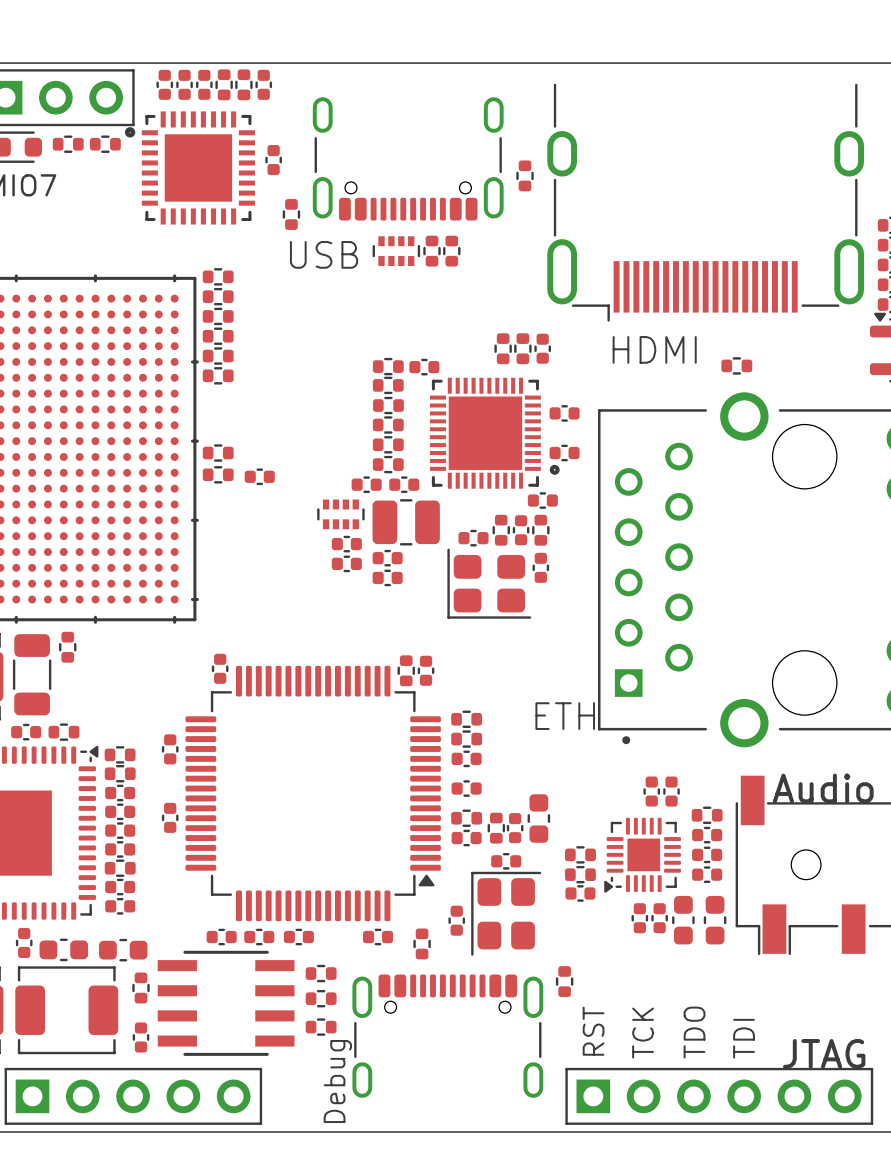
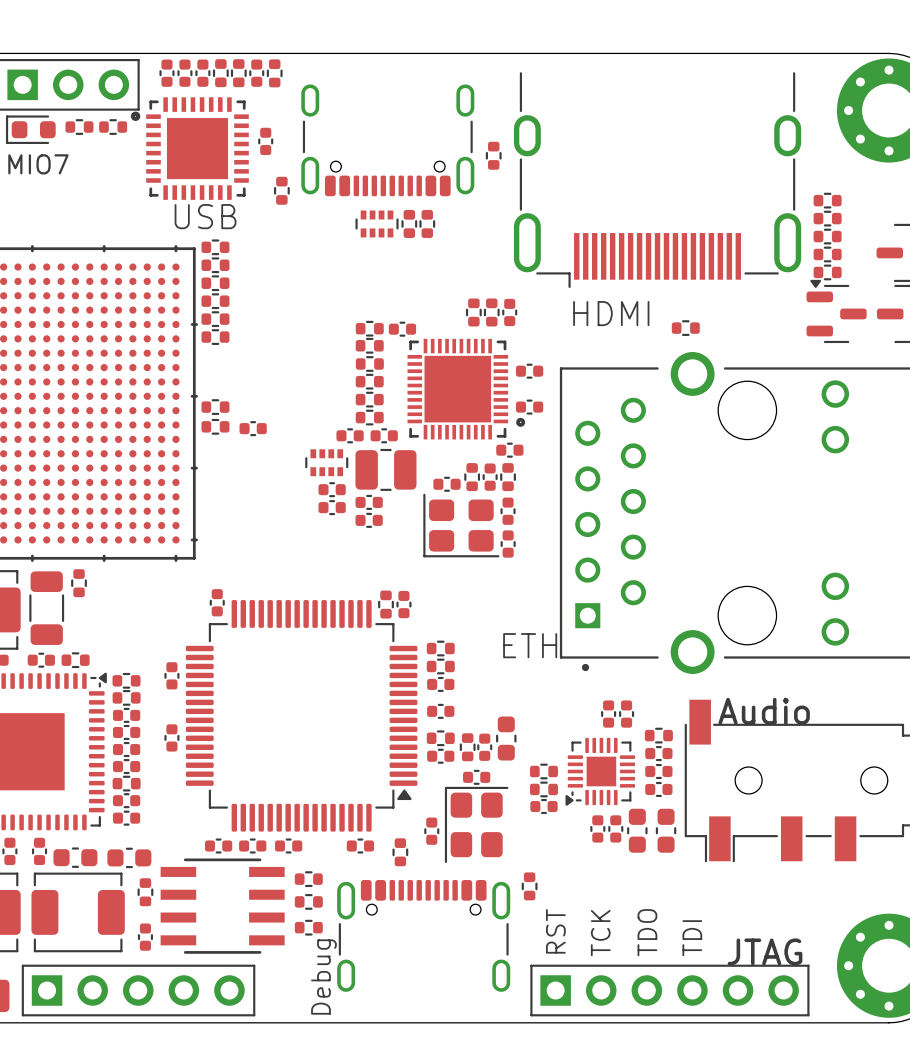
part: none -> (274, 73)
text position: USB (324, 254) -> USB (205, 216)
part: none -> (508, 544)

